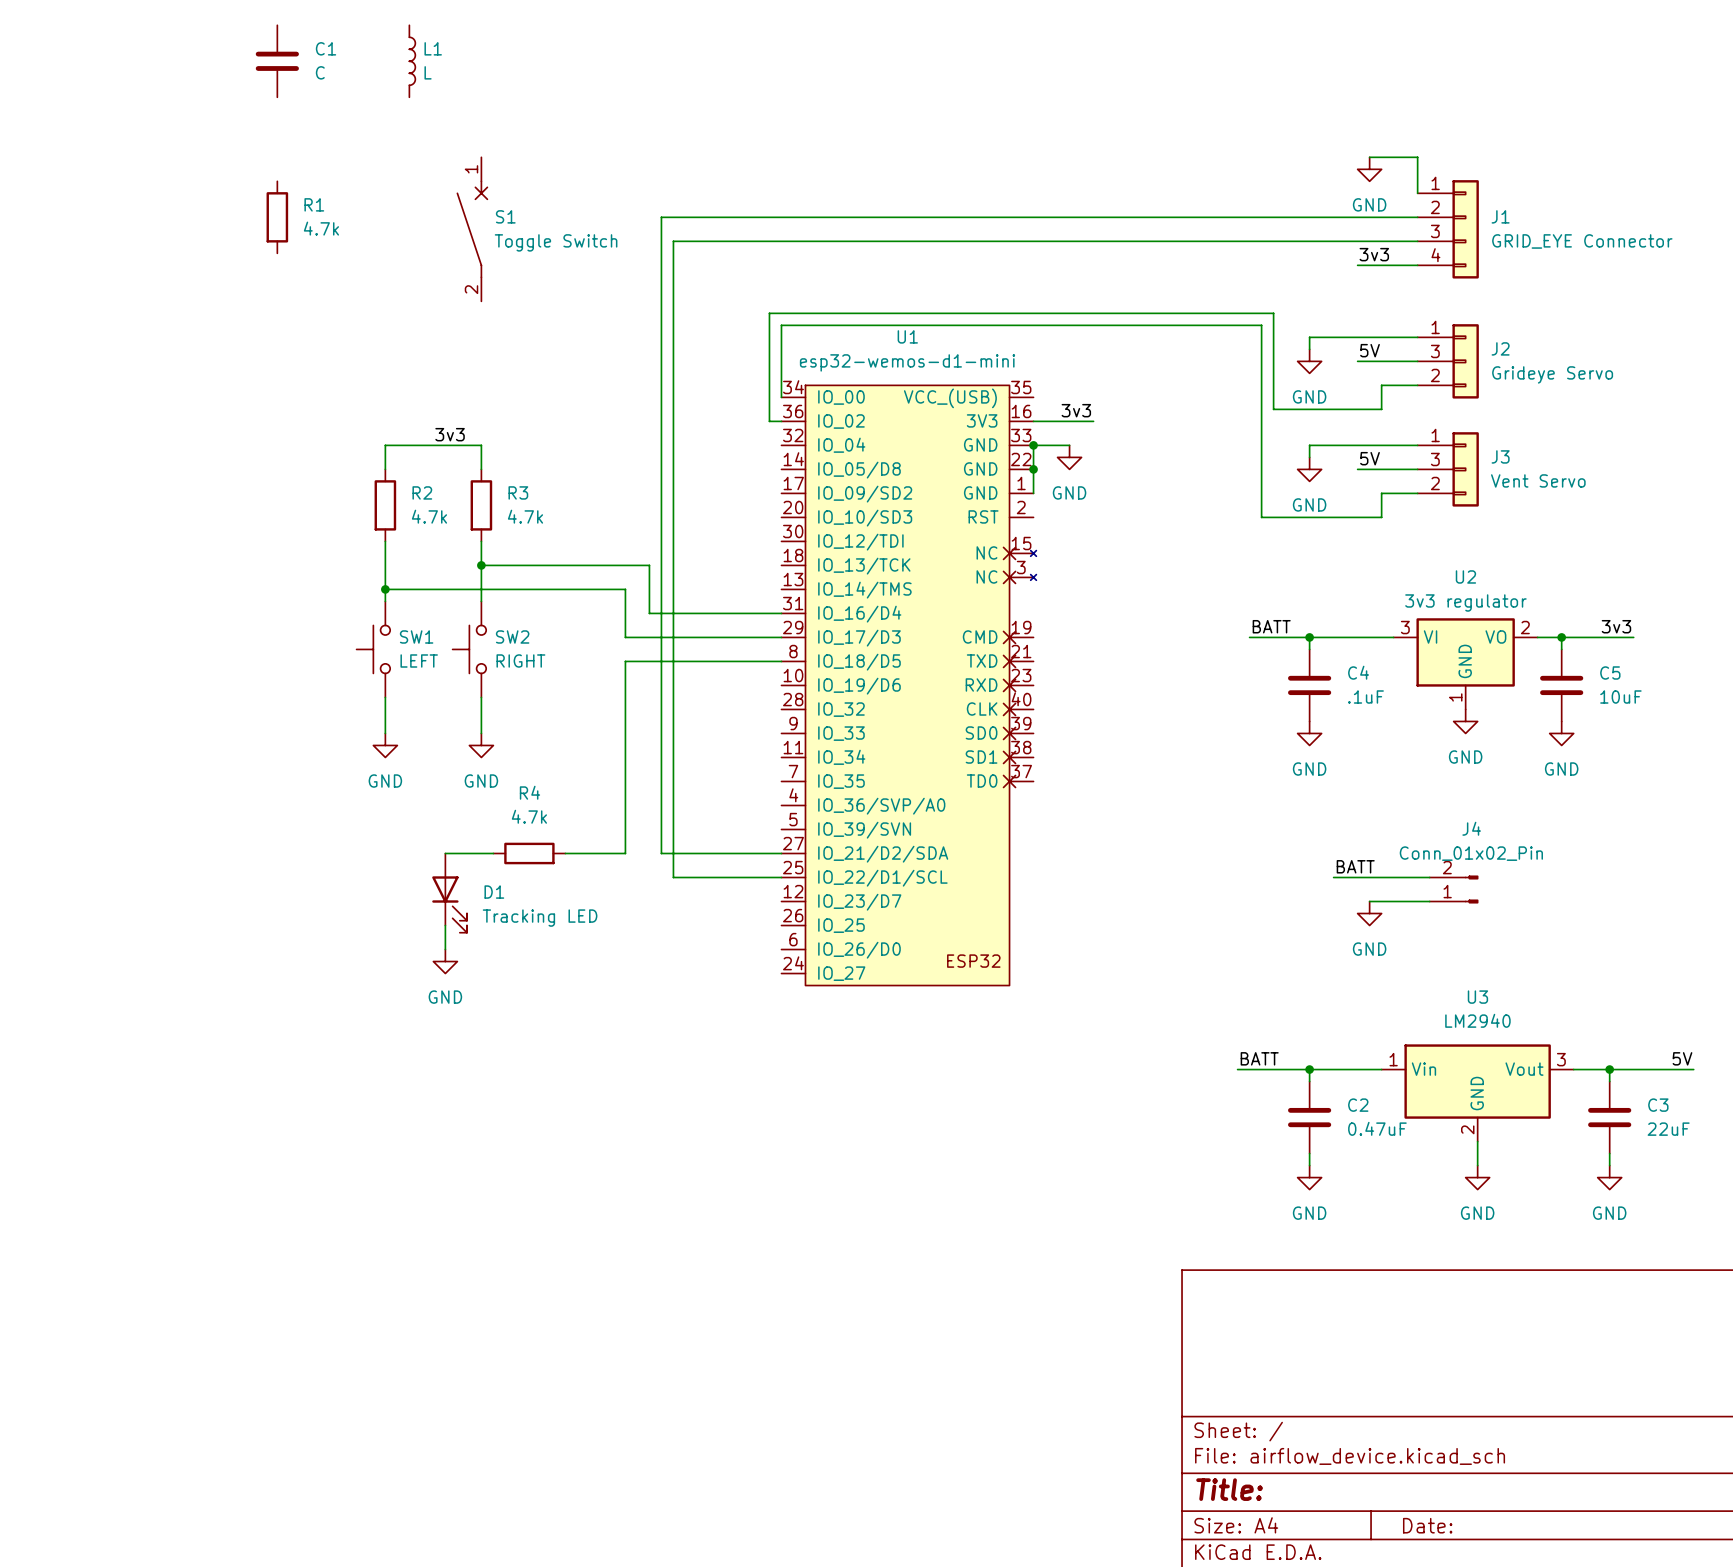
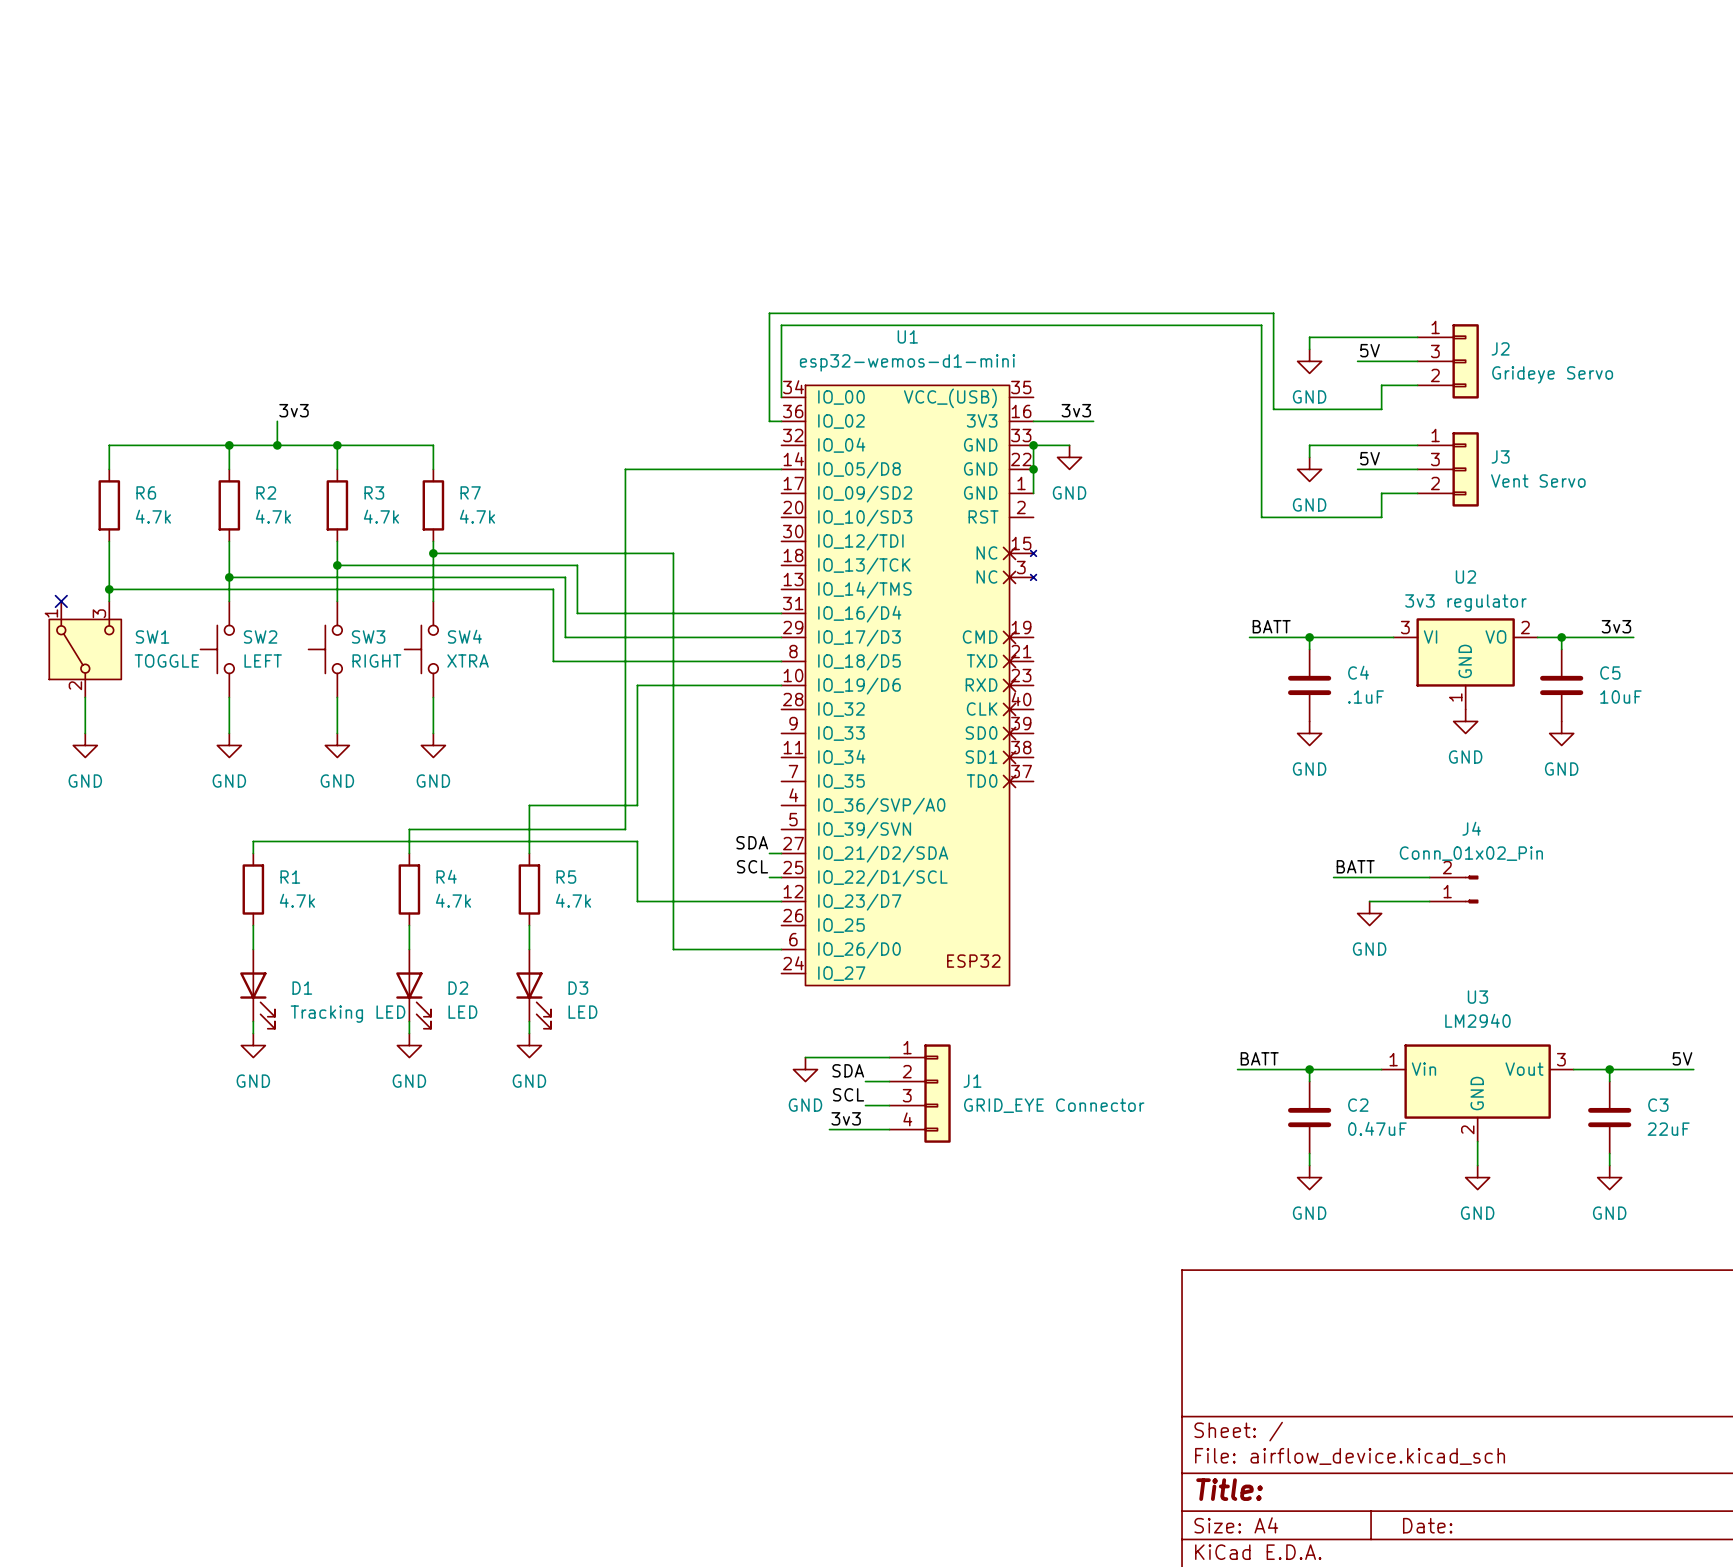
C1: C (277, 61) -> none
L1: L (412, 61) -> none
wire: (1369, 157) (1417, 157) (1417, 193) -> none
power symbol: GND (1369, 169) -> none
R1 position: (277, 217) -> (253, 889)
wire: (1417, 217) (661, 217) (661, 853) (769, 853) -> none
S1: Toggle Switch (472, 229) -> none
J1 position: (1448, 229) -> (920, 1093)
wire: (1417, 241) (673, 241) (673, 553) -> (433, 553) (673, 553)
label: 3v3 (1374, 254) -> none
wire: (1357, 265) (1417, 265) -> none
wire: none -> (277, 421) (277, 445)
label position: 3v3 (450, 434) -> 3v3 (294, 410)
wire: none -> (229, 445) (229, 469)
junction: none -> (229, 445)
junction: none -> (277, 445)
wire: none -> (337, 445) (337, 469)
junction: none -> (337, 445)
wire: (385, 445) (385, 469) -> (385, 445) (109, 445) (109, 469)
wire: (433, 445) (481, 445) (481, 469) -> (433, 445) (433, 469)
R6: none -> 4.7k (109, 505)
R2 position: (385, 505) -> (229, 505)
R7: none -> 4.7k (433, 505)
R3 position: (481, 505) -> (337, 505)
wire: none -> (109, 541) (109, 601)
wire: none -> (229, 541) (229, 601)
wire: (385, 541) (385, 601) -> (337, 541) (337, 601)
wire: (481, 541) (481, 601) -> (433, 541) (433, 601)
junction: none -> (433, 553)
wire: none -> (337, 565) (481, 565)
junction: none -> (337, 565)
junction: (481, 565) -> none
wire: (577, 565) (649, 565) (649, 613) -> (577, 565) (577, 613) (649, 613)
wire: none -> (229, 577) (565, 577) (565, 637) (625, 637) (625, 661) (553, 661) (553, 589)
junction: none -> (229, 577)
wire: none -> (109, 589) (385, 589)
junction: none -> (109, 589)
junction: (385, 589) -> none
wire: (553, 589) (625, 589) -> (781, 469) (625, 469) (625, 589)
no-connect mark: none -> (61, 601)
SW1 symbol: [356, 601, 391, 698] -> [49, 601, 122, 698]
SW1 name position: SW1 (416, 636) -> SW1 (152, 636)
SW3: none -> RIGHT (325, 649)
SW4: none -> XTRA (421, 649)
SW2 position: (469, 649) -> (217, 649)
SW1 value: LEFT (419, 660) -> TOGGLE (166, 660)
SW2 value: RIGHT (520, 660) -> LEFT (263, 660)
wire: none -> (781, 685) (637, 685) (637, 805) (529, 805) (529, 853)
wire: none -> (85, 697) (85, 733)
wire: none -> (229, 697) (229, 733)
wire: (385, 697) (385, 733) -> (337, 697) (337, 733)
wire: (481, 697) (481, 733) -> (433, 697) (433, 733)
power symbol: none -> GND (85, 745)
power symbol: none -> GND (229, 745)
power symbol: none -> GND (337, 745)
power symbol: GND (385, 745) -> none
power symbol: none -> GND (433, 745)
power symbol: GND (481, 745) -> none
R4 name position: R4 (529, 792) -> R4 (446, 876)
wire: (625, 829) (625, 853) (565, 853) -> (625, 829) (409, 829) (409, 853)
label: none -> SDA (752, 842)
wire: none -> (253, 853) (253, 841) (637, 841) (637, 901) (781, 901)
wire: (445, 853) (493, 853) -> none
R4 rotation: 0° (529, 853) -> 90° clockwise (409, 889)
R4 position: (529, 853) -> (409, 889)
label: none -> SCL (752, 866)
wire: (673, 877) (769, 877) -> (673, 877) (673, 949) (781, 949)
R5: none -> 4.7k (529, 889)
D1 position: (449, 893) -> (257, 989)
wire: none -> (253, 925) (253, 949)
wire: (445, 925) (445, 949) -> (409, 925) (409, 949)
wire: none -> (529, 925) (529, 949)
power symbol: GND (445, 961) -> none
D2: none -> LED (413, 989)
D3: none -> LED (533, 989)
wire: none -> (253, 1021) (253, 1033)
wire: none -> (409, 1021) (409, 1033)
wire: none -> (529, 1021) (529, 1033)
power symbol: none -> GND (253, 1045)
power symbol: none -> GND (409, 1045)
power symbol: none -> GND (529, 1045)
wire: none -> (805, 1057) (889, 1057)
power symbol: none -> GND (805, 1069)
label: none -> SDA (848, 1070)
wire: none -> (865, 1081) (889, 1081)
label: none -> SCL (848, 1094)
wire: none -> (865, 1105) (889, 1105)
label: none -> 3v3 (846, 1118)
wire: none -> (829, 1129) (889, 1129)

